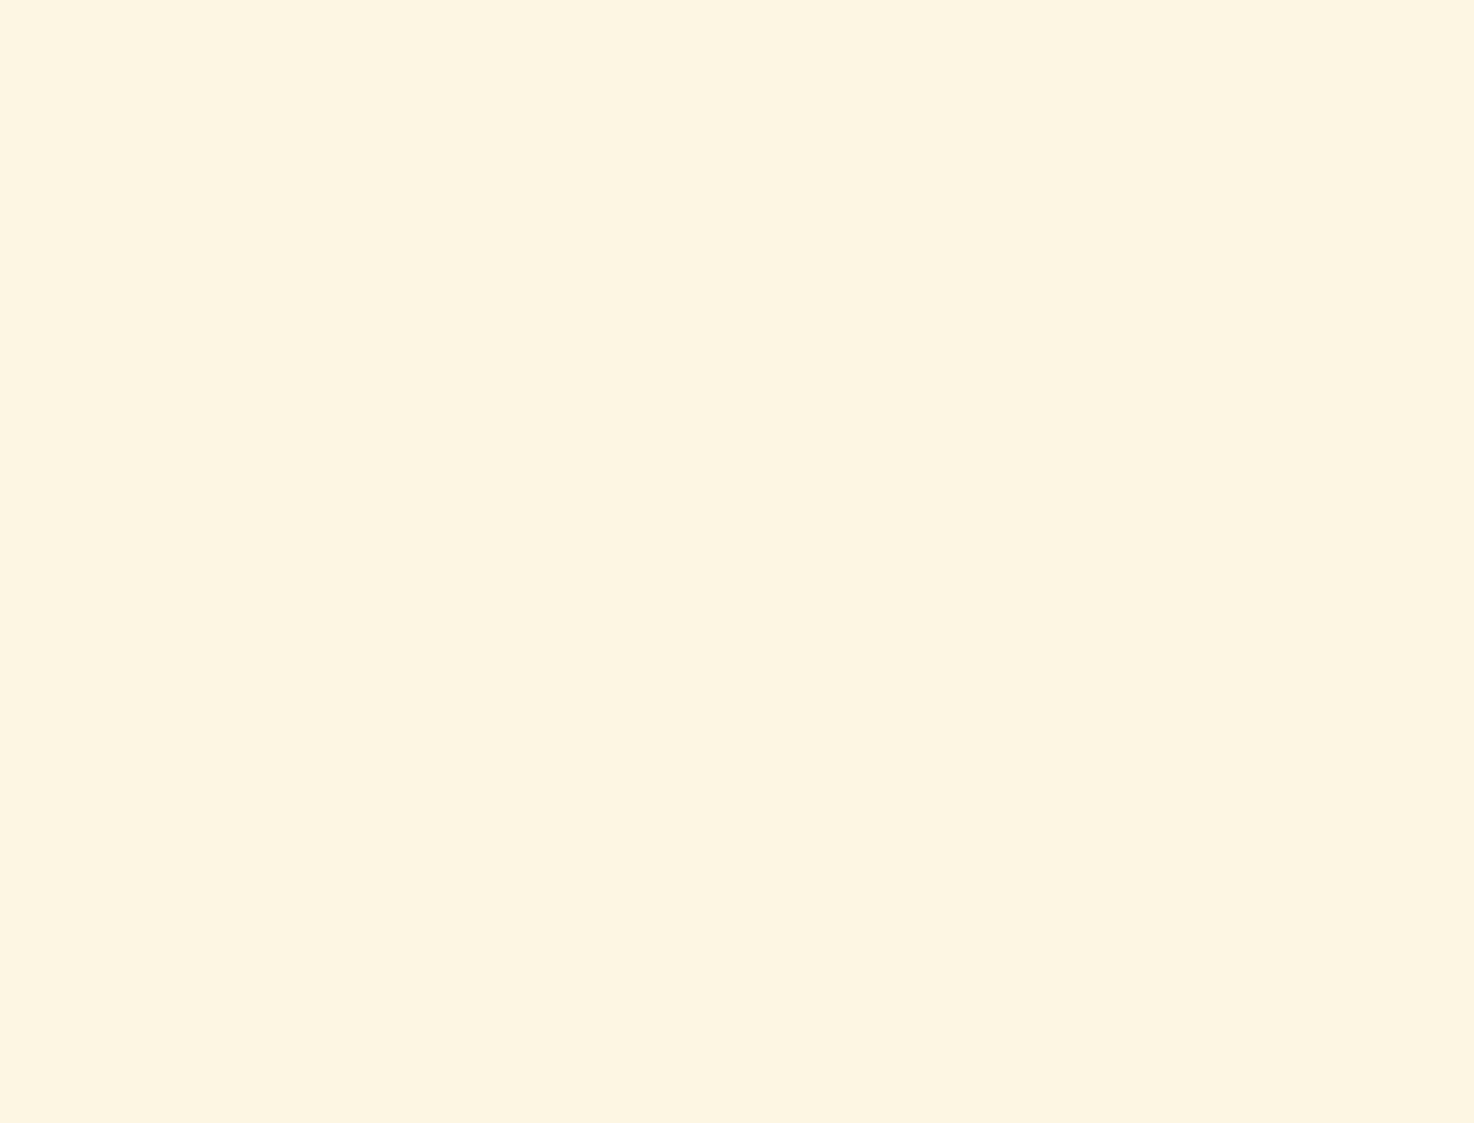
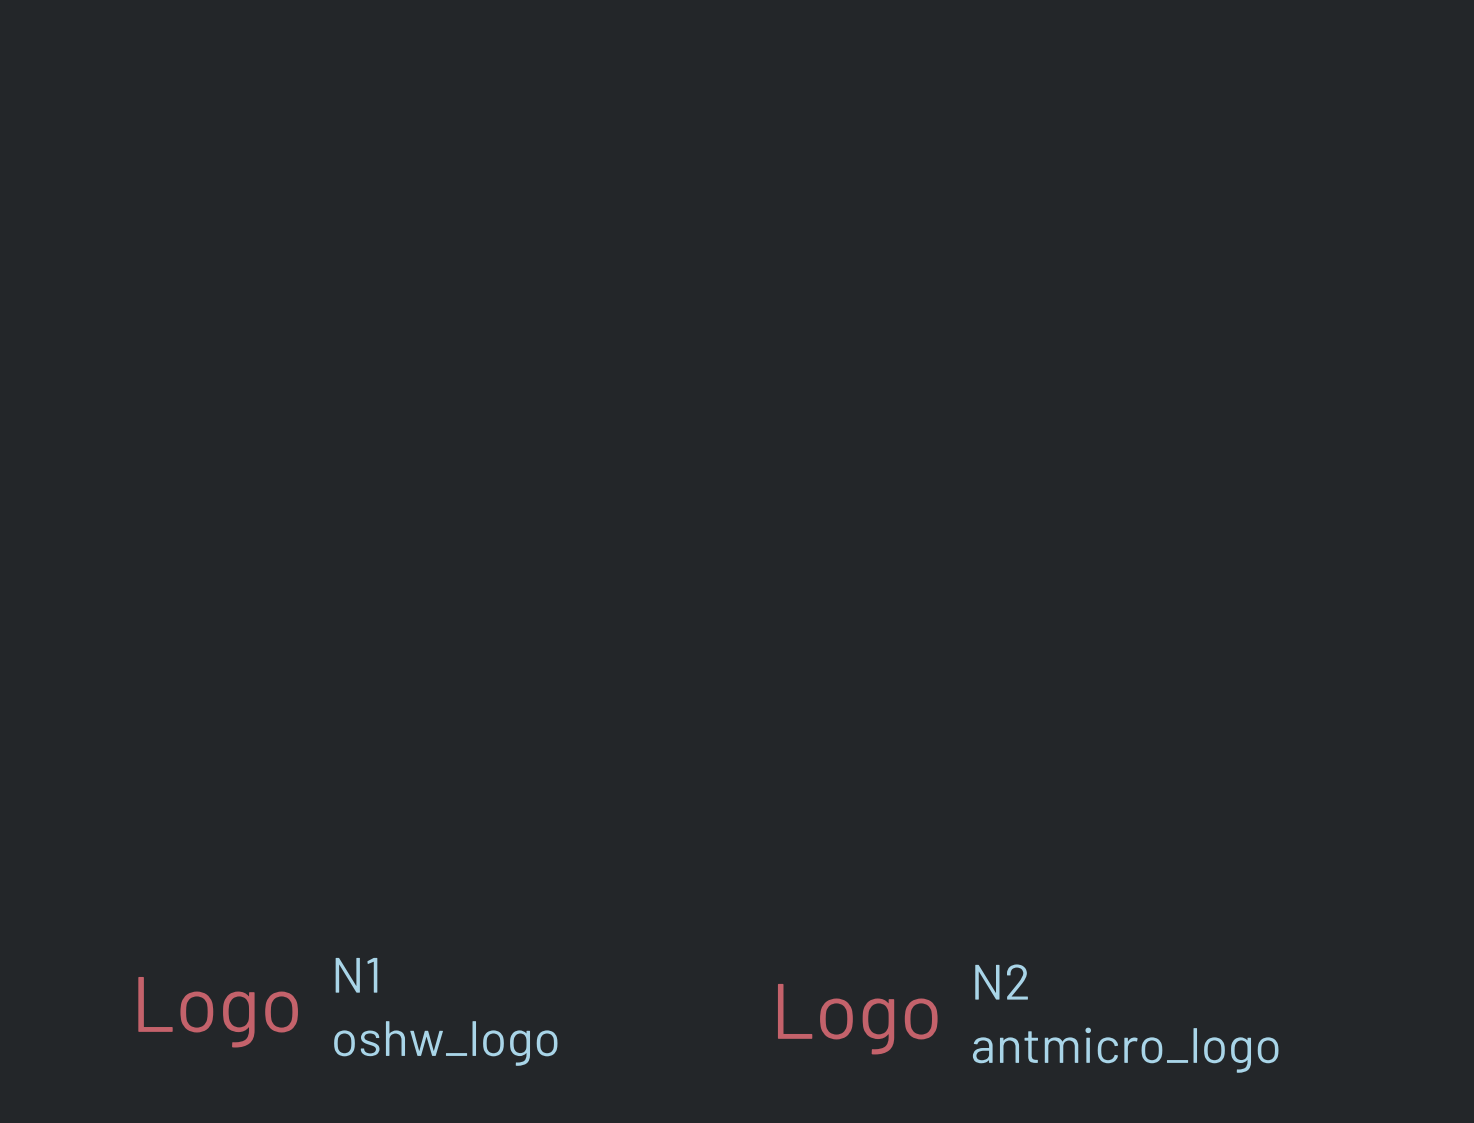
N1: none -> oshw_logo (347, 1011)
N2: none -> antmicro_logo (1028, 1018)

